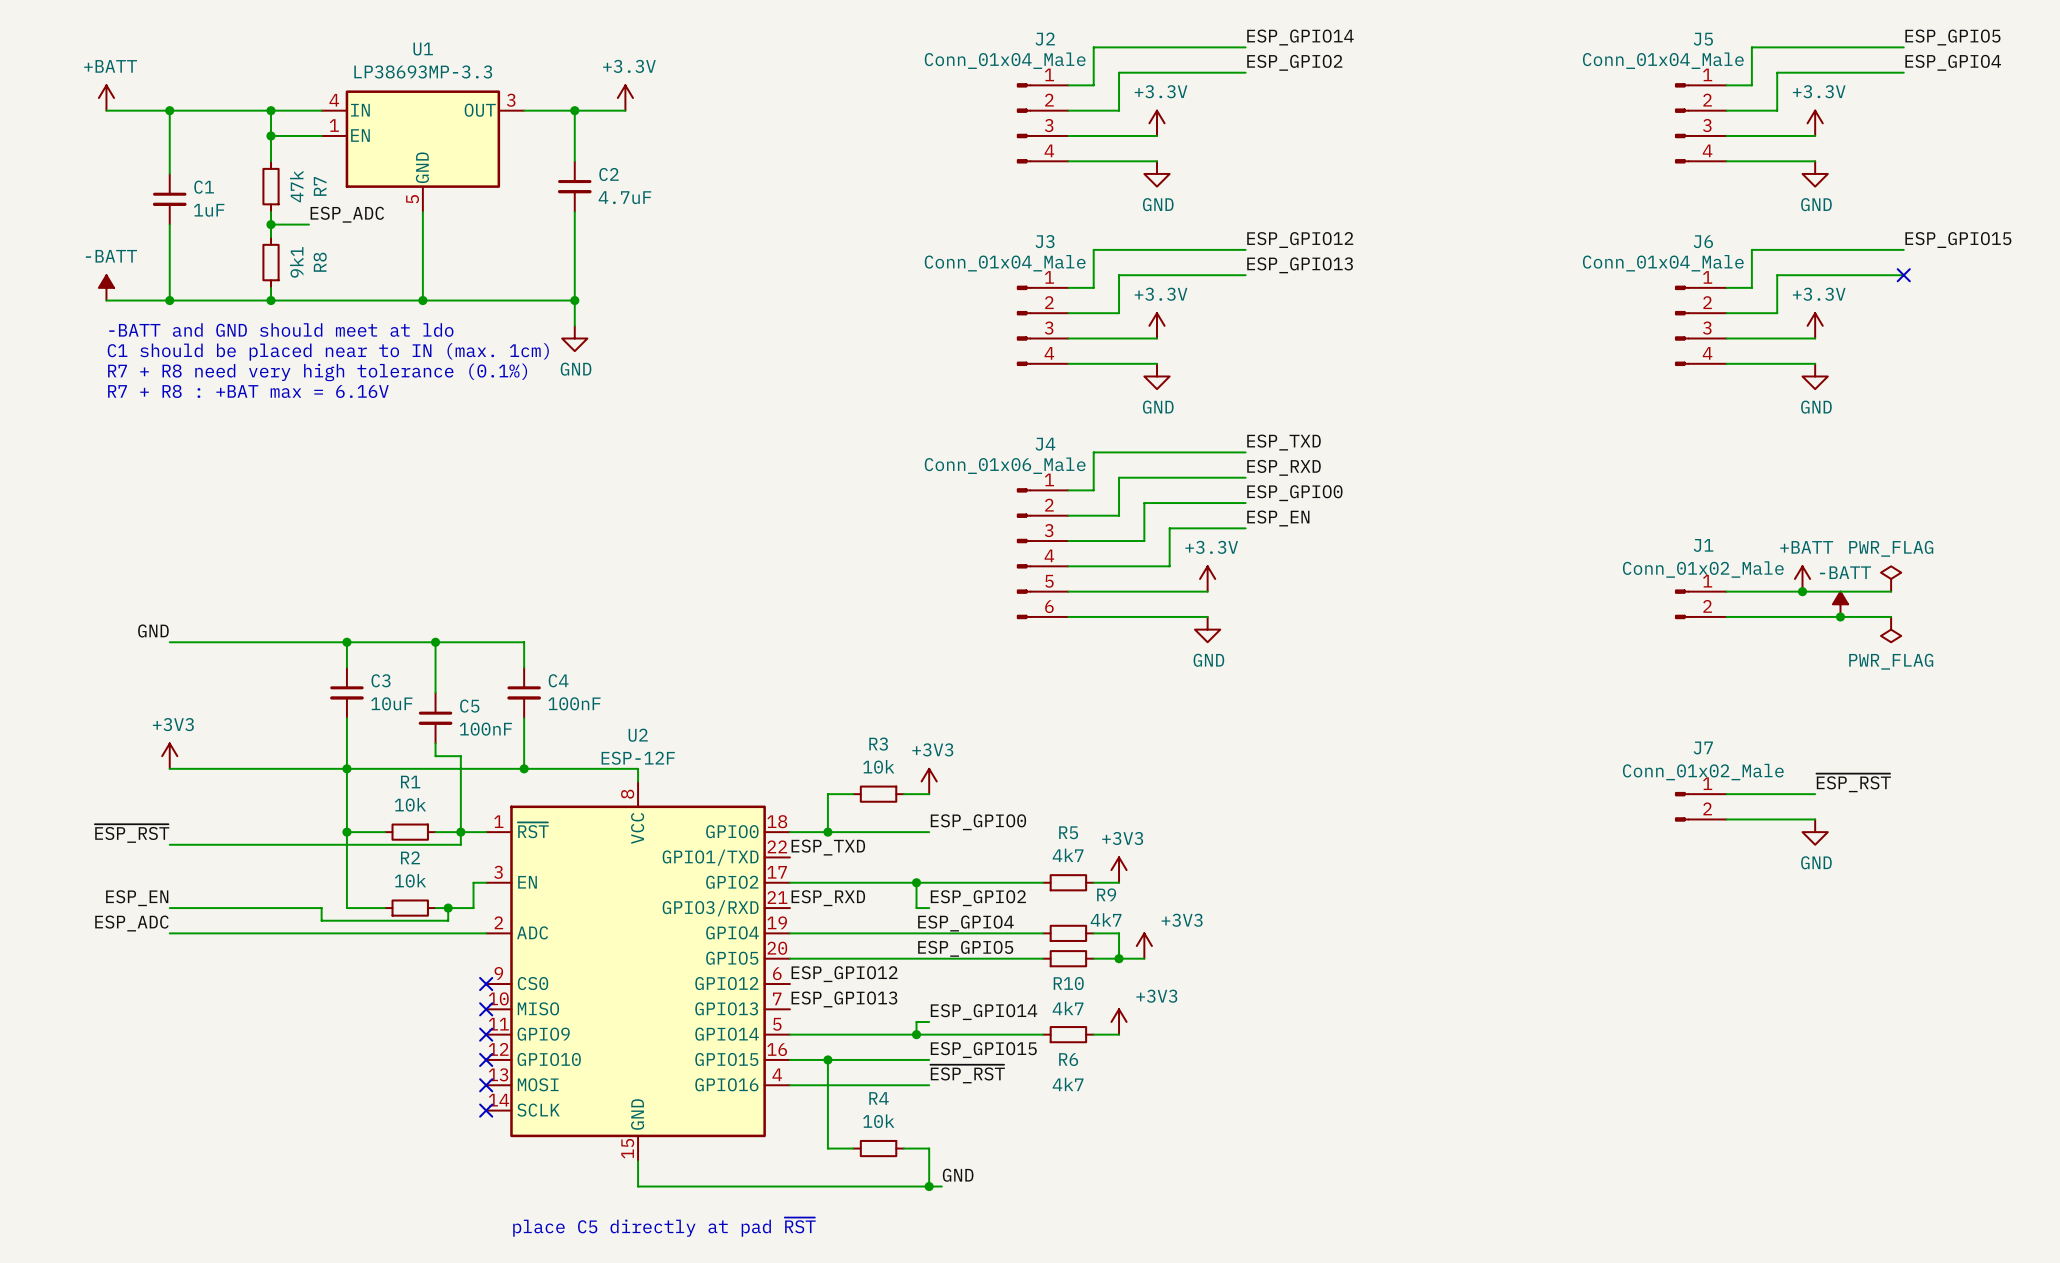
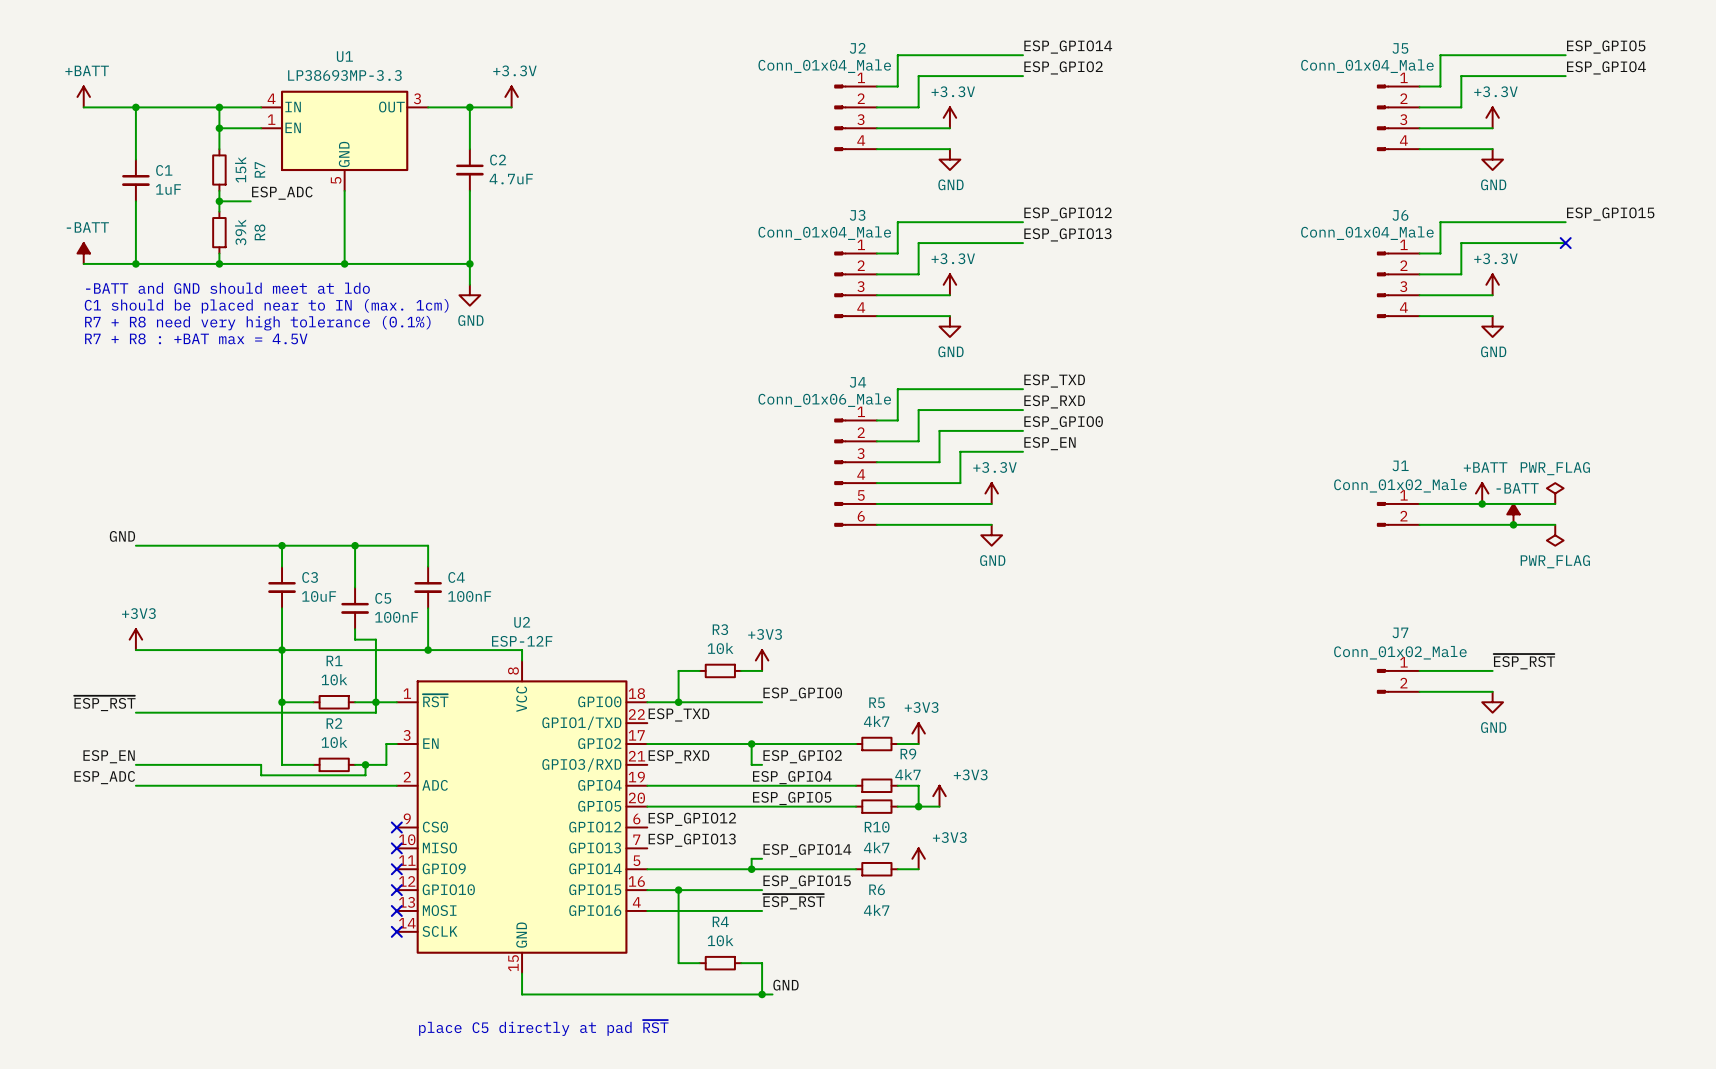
R7 value: 47k (296, 186) -> 15k (240, 169)
R8 value: 9k1 (296, 262) -> 39k (240, 232)
text: R7 + R8 : +BAT max = 6.16V (248, 391) -> R7 + R8 : +BAT max = 4.5V (196, 338)

